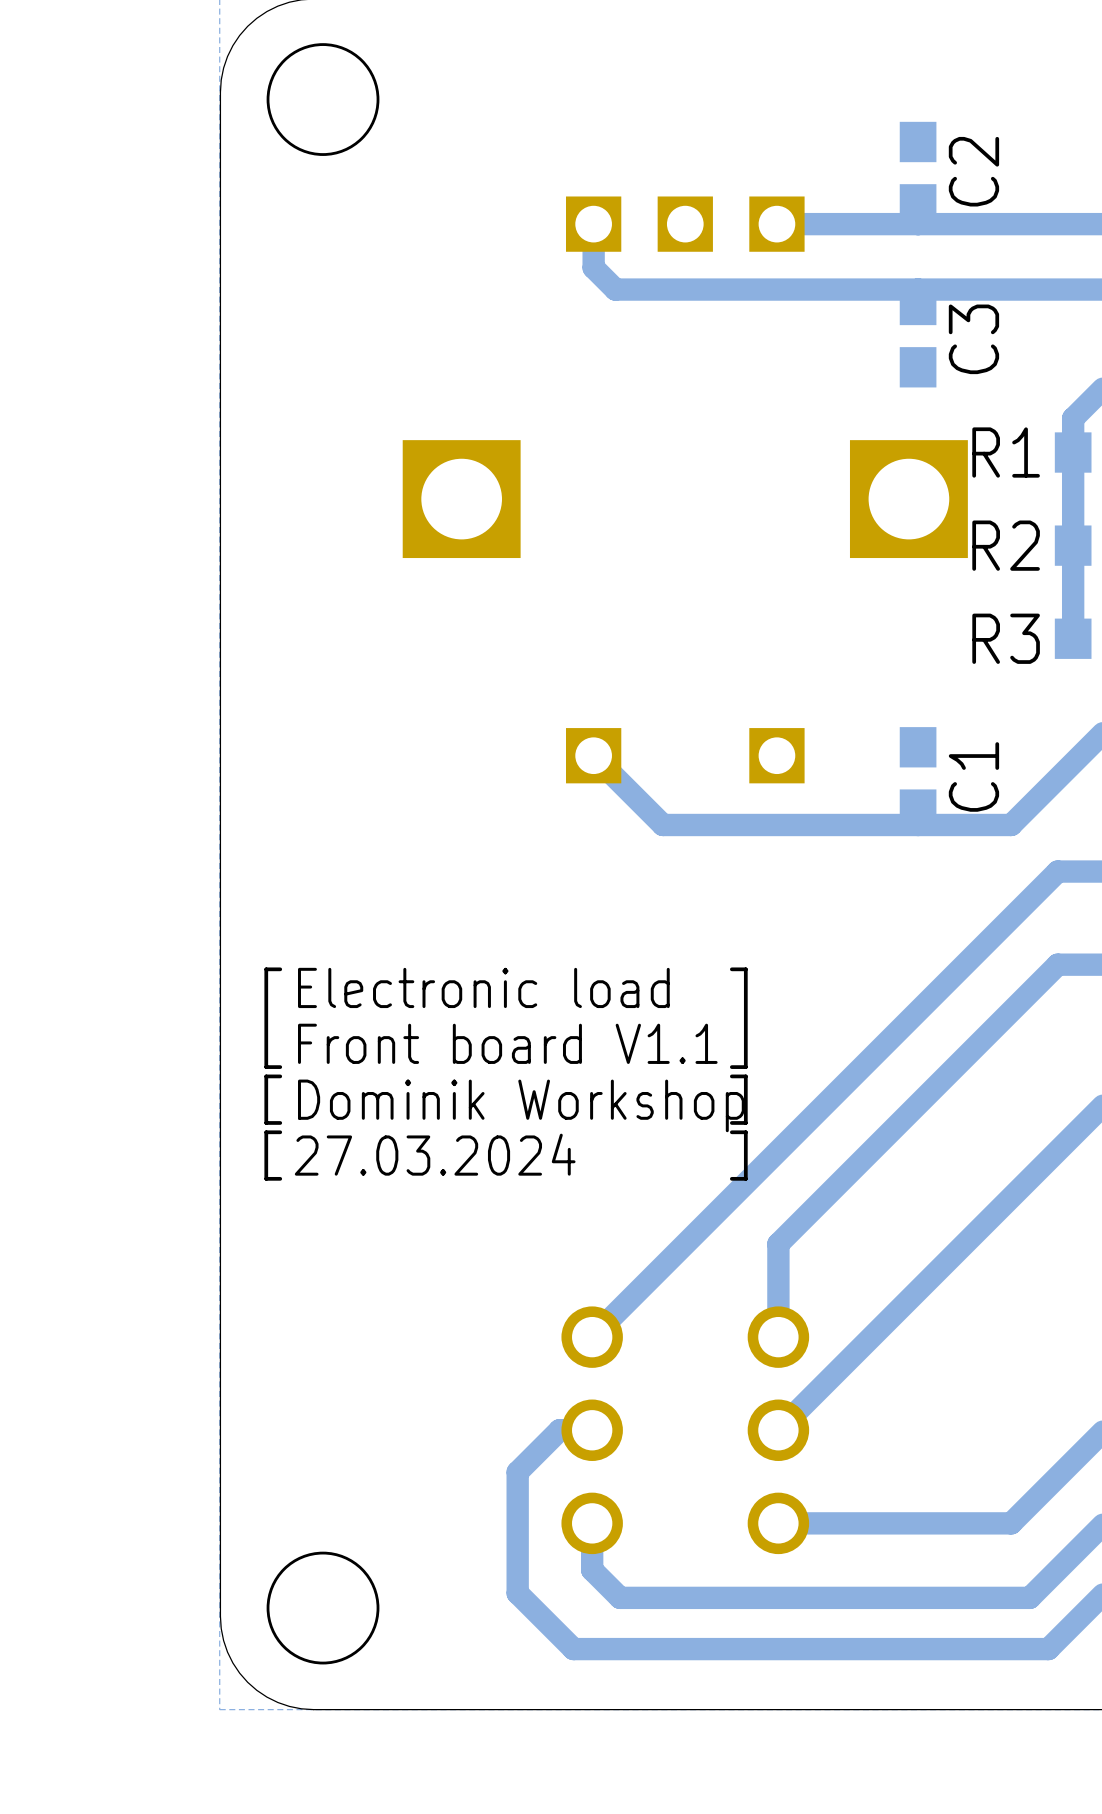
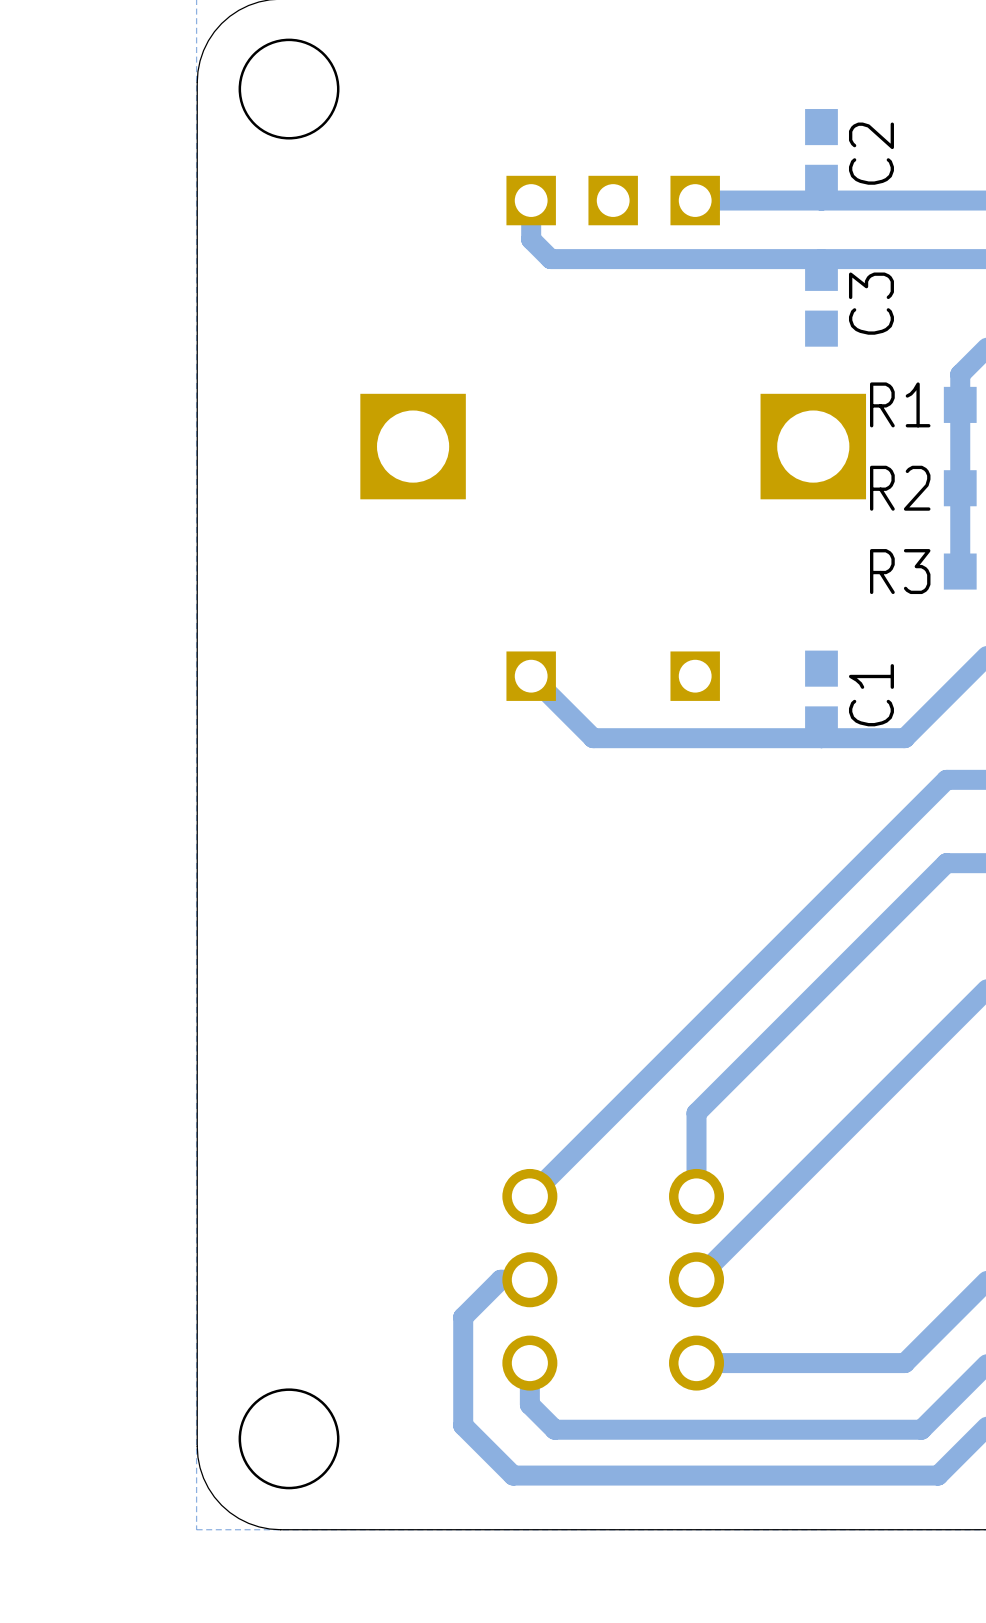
line: (280, 969) (266, 969) (266, 1067) (280, 1067) -> none
line: (731, 969) (745, 969) (745, 1067) (731, 1067) -> none
text: Electronic load (483, 987) -> none
text: Front board V1.1 (507, 1043) -> none
line: (280, 1076) (266, 1076) (266, 1122) (280, 1122) -> none
line: (731, 1076) (745, 1076) (745, 1122) (731, 1122) -> none
text: Dominik Workshop (521, 1105) -> none
line: (280, 1132) (266, 1132) (266, 1178) (280, 1178) -> none
line: (731, 1132) (745, 1132) (745, 1178) (731, 1178) -> none
text: 27.03.2024 (435, 1154) -> none

